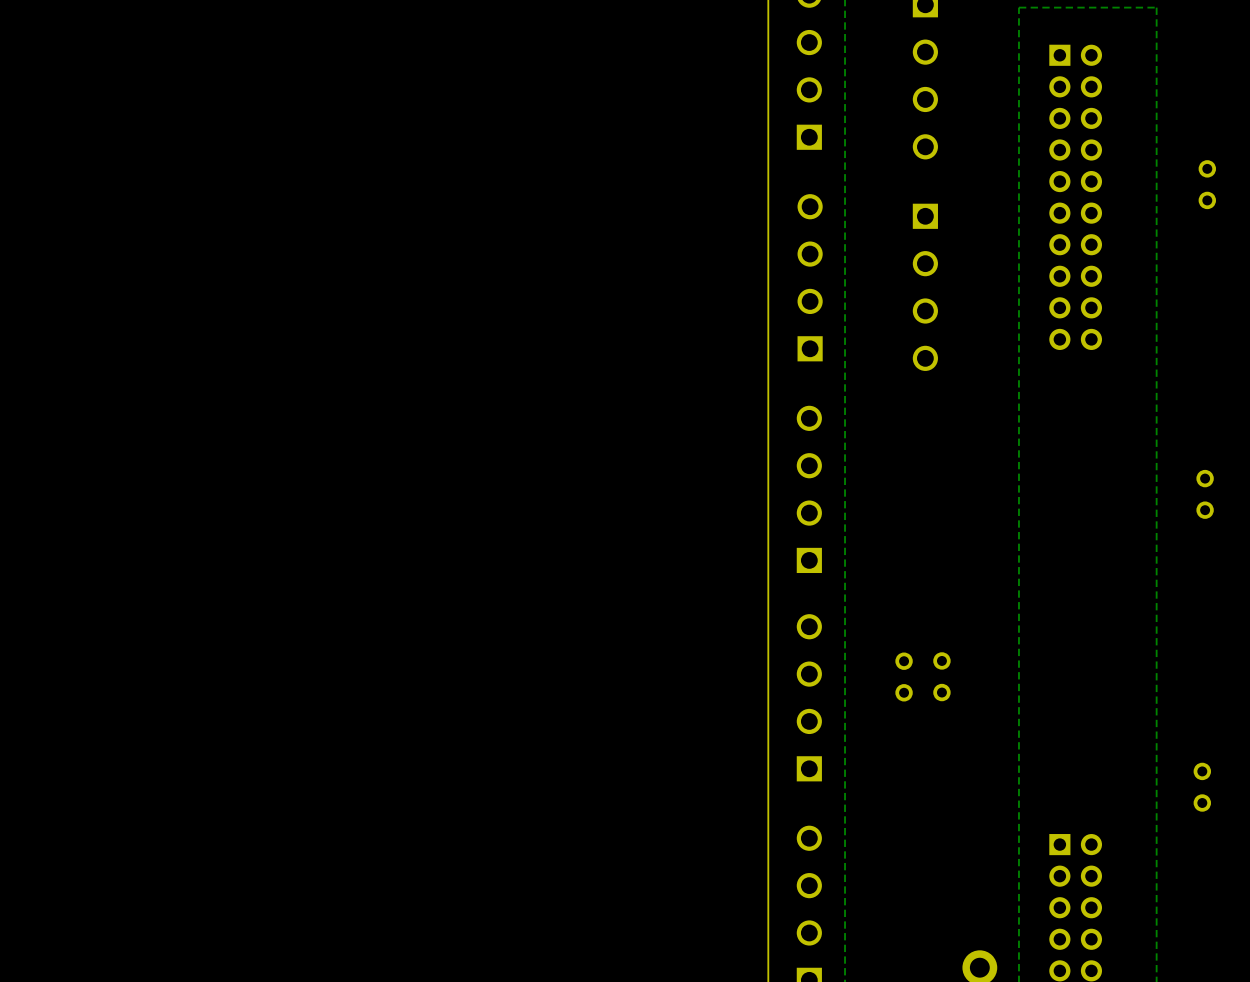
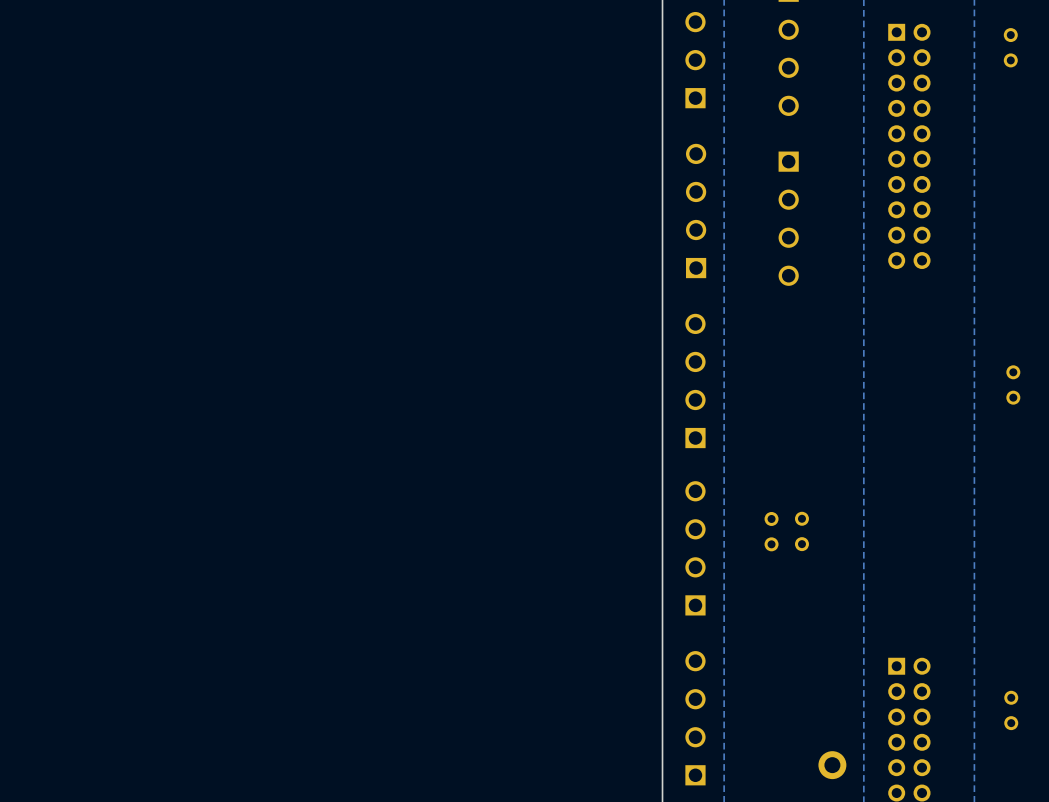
part position: (1207, 184) -> (1010, 47)
part position: (1202, 787) -> (1011, 710)

